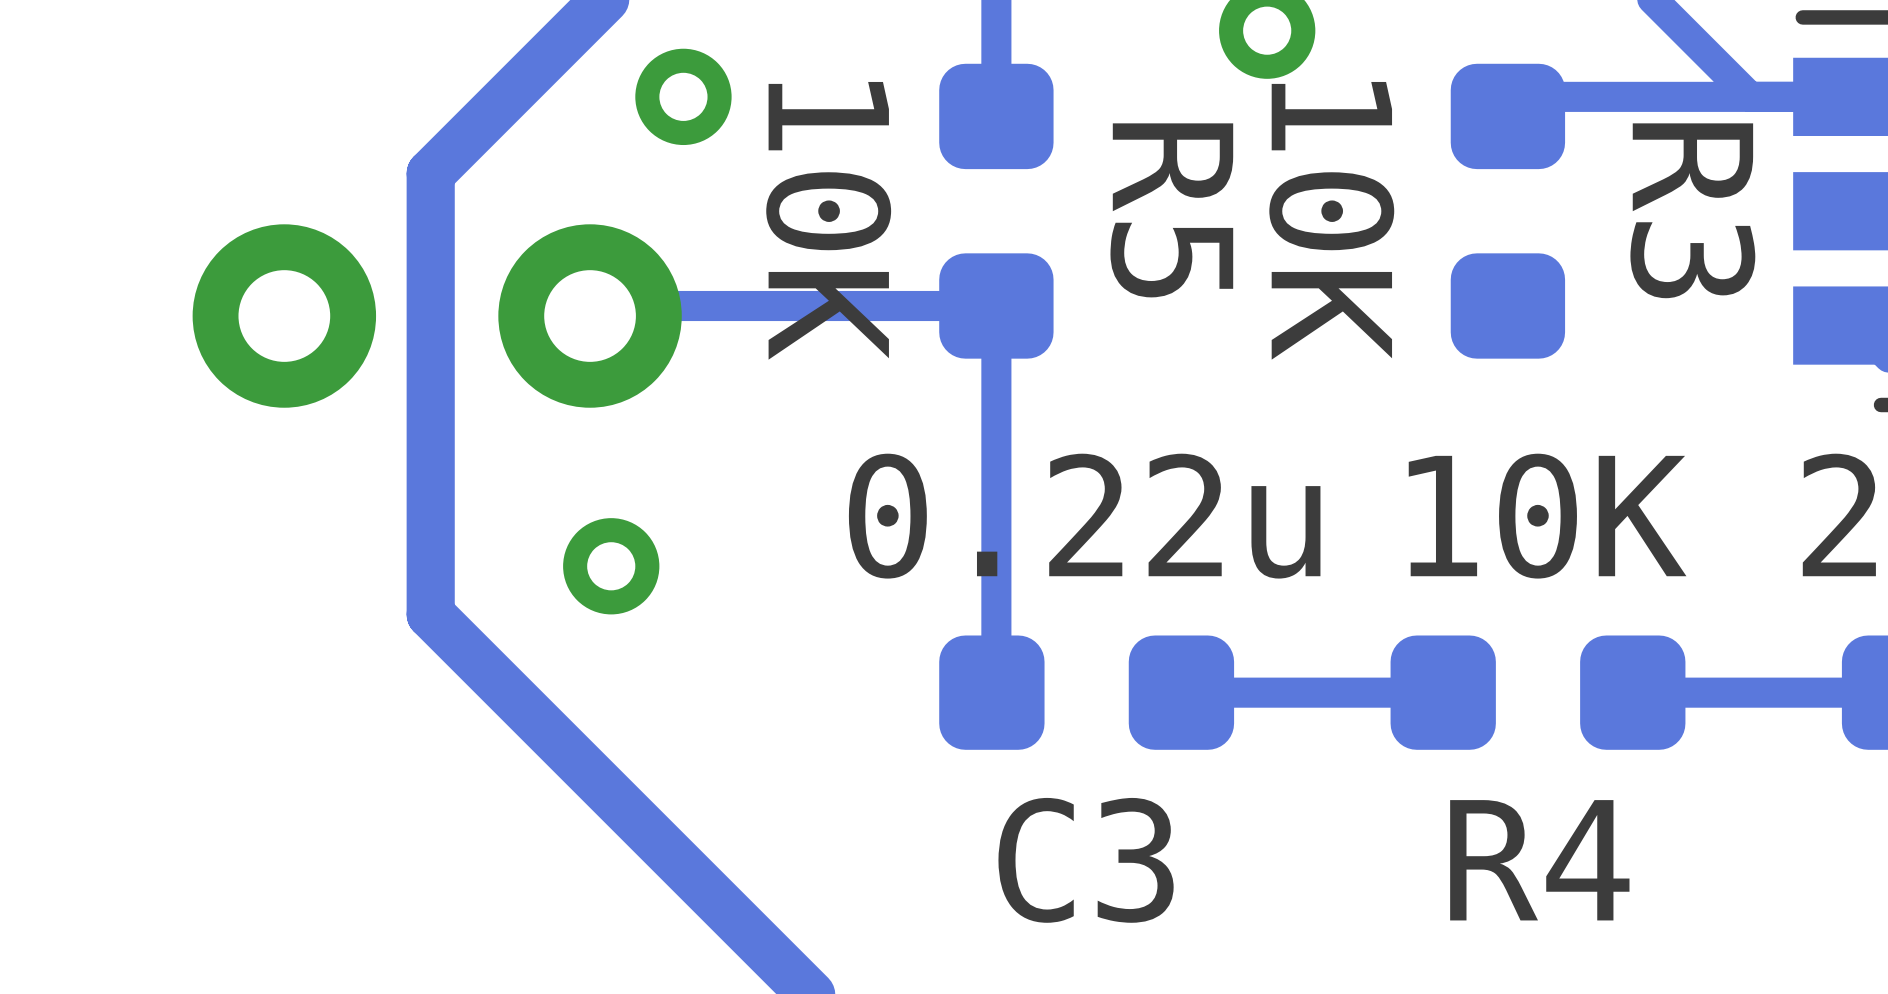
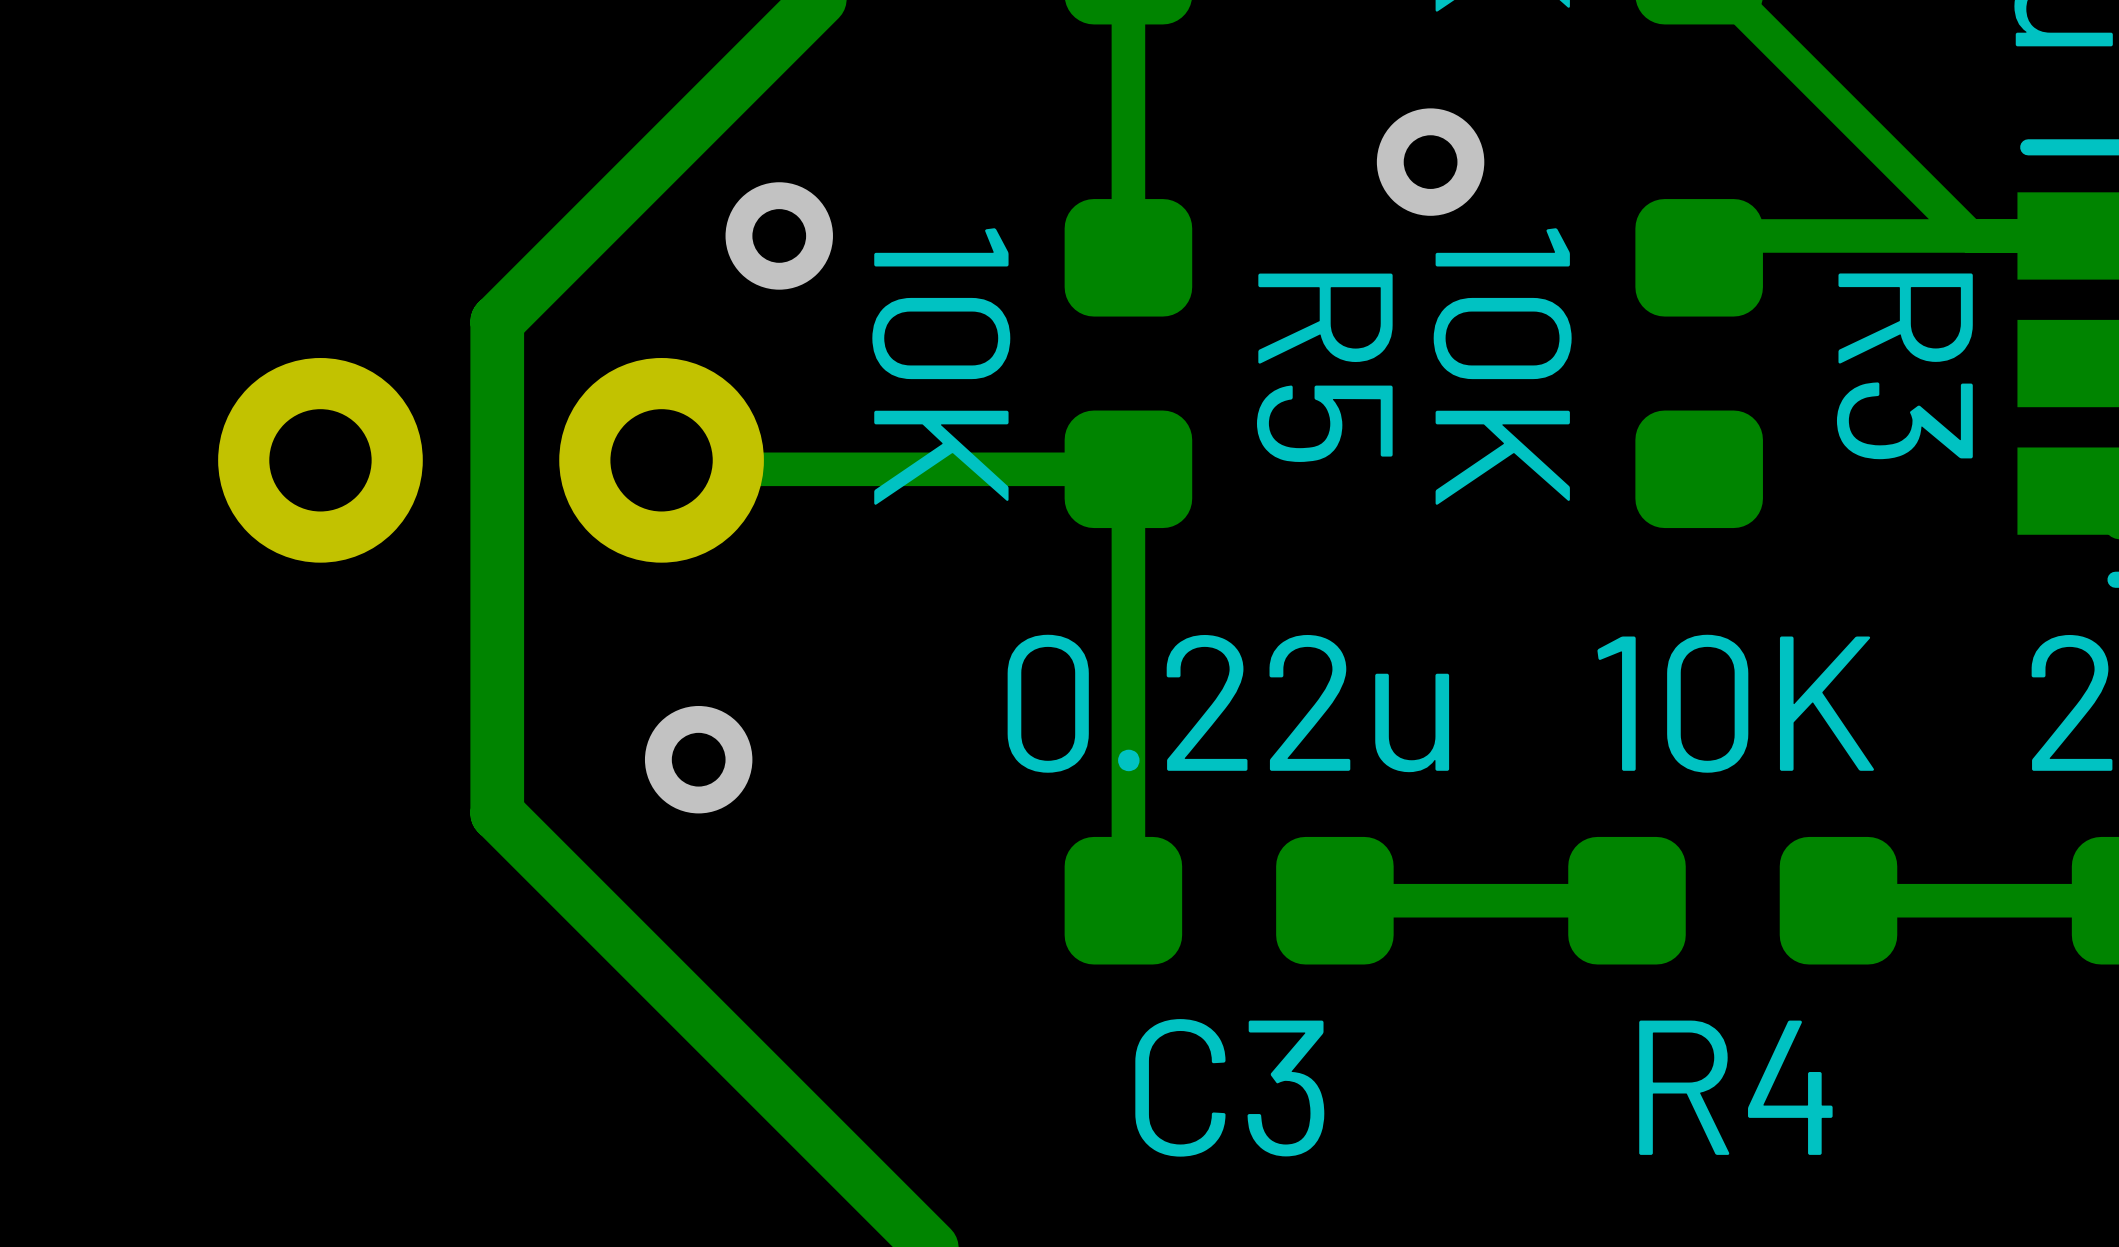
part position: (437, 316) -> (491, 460)

